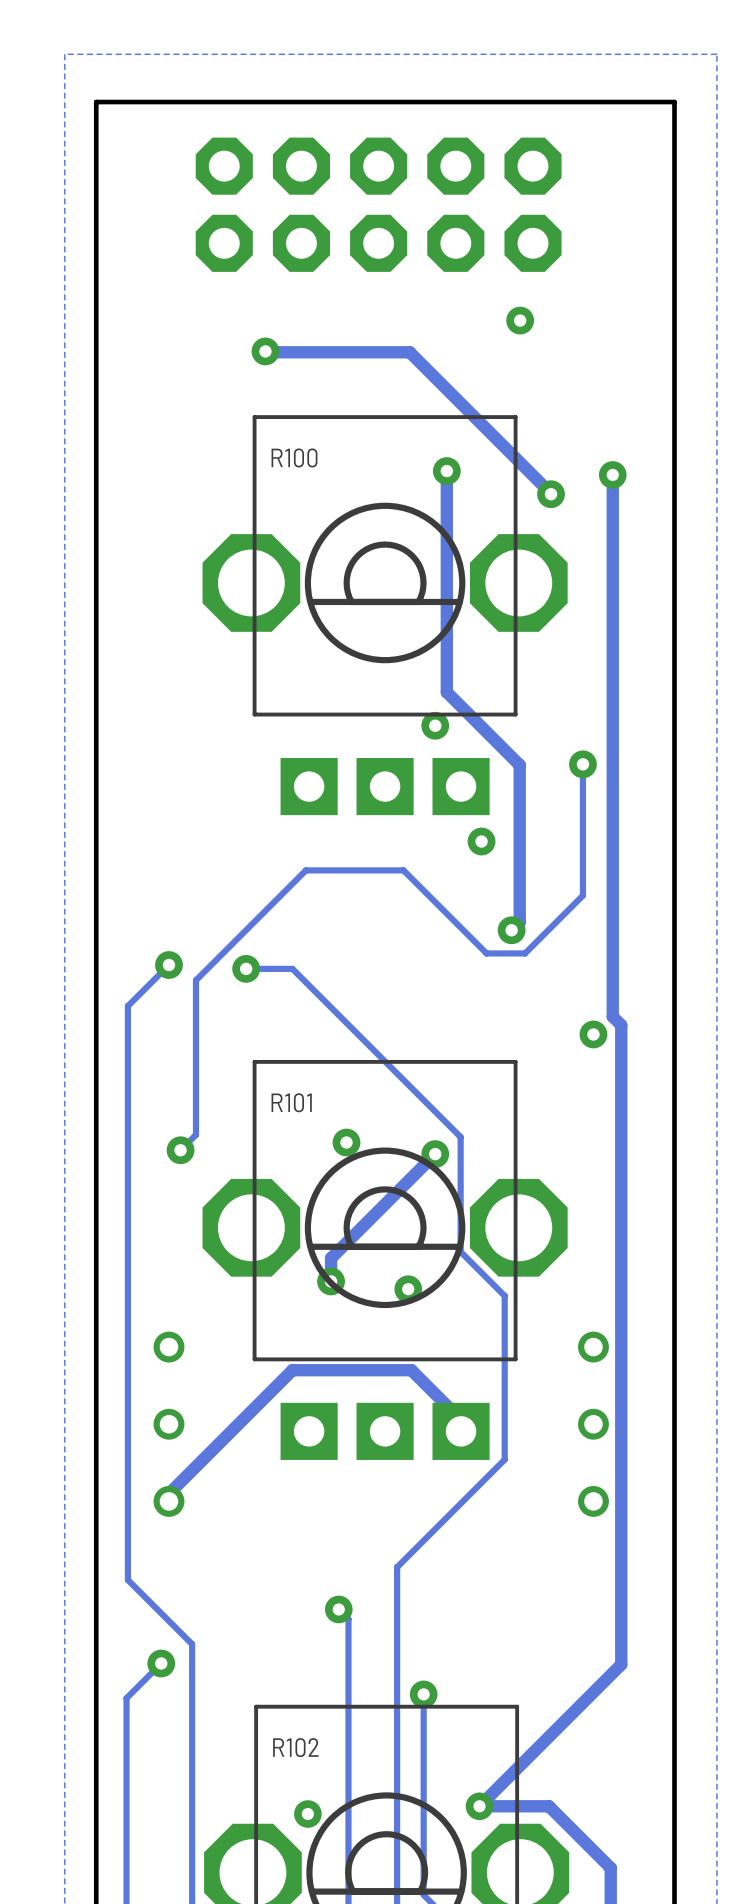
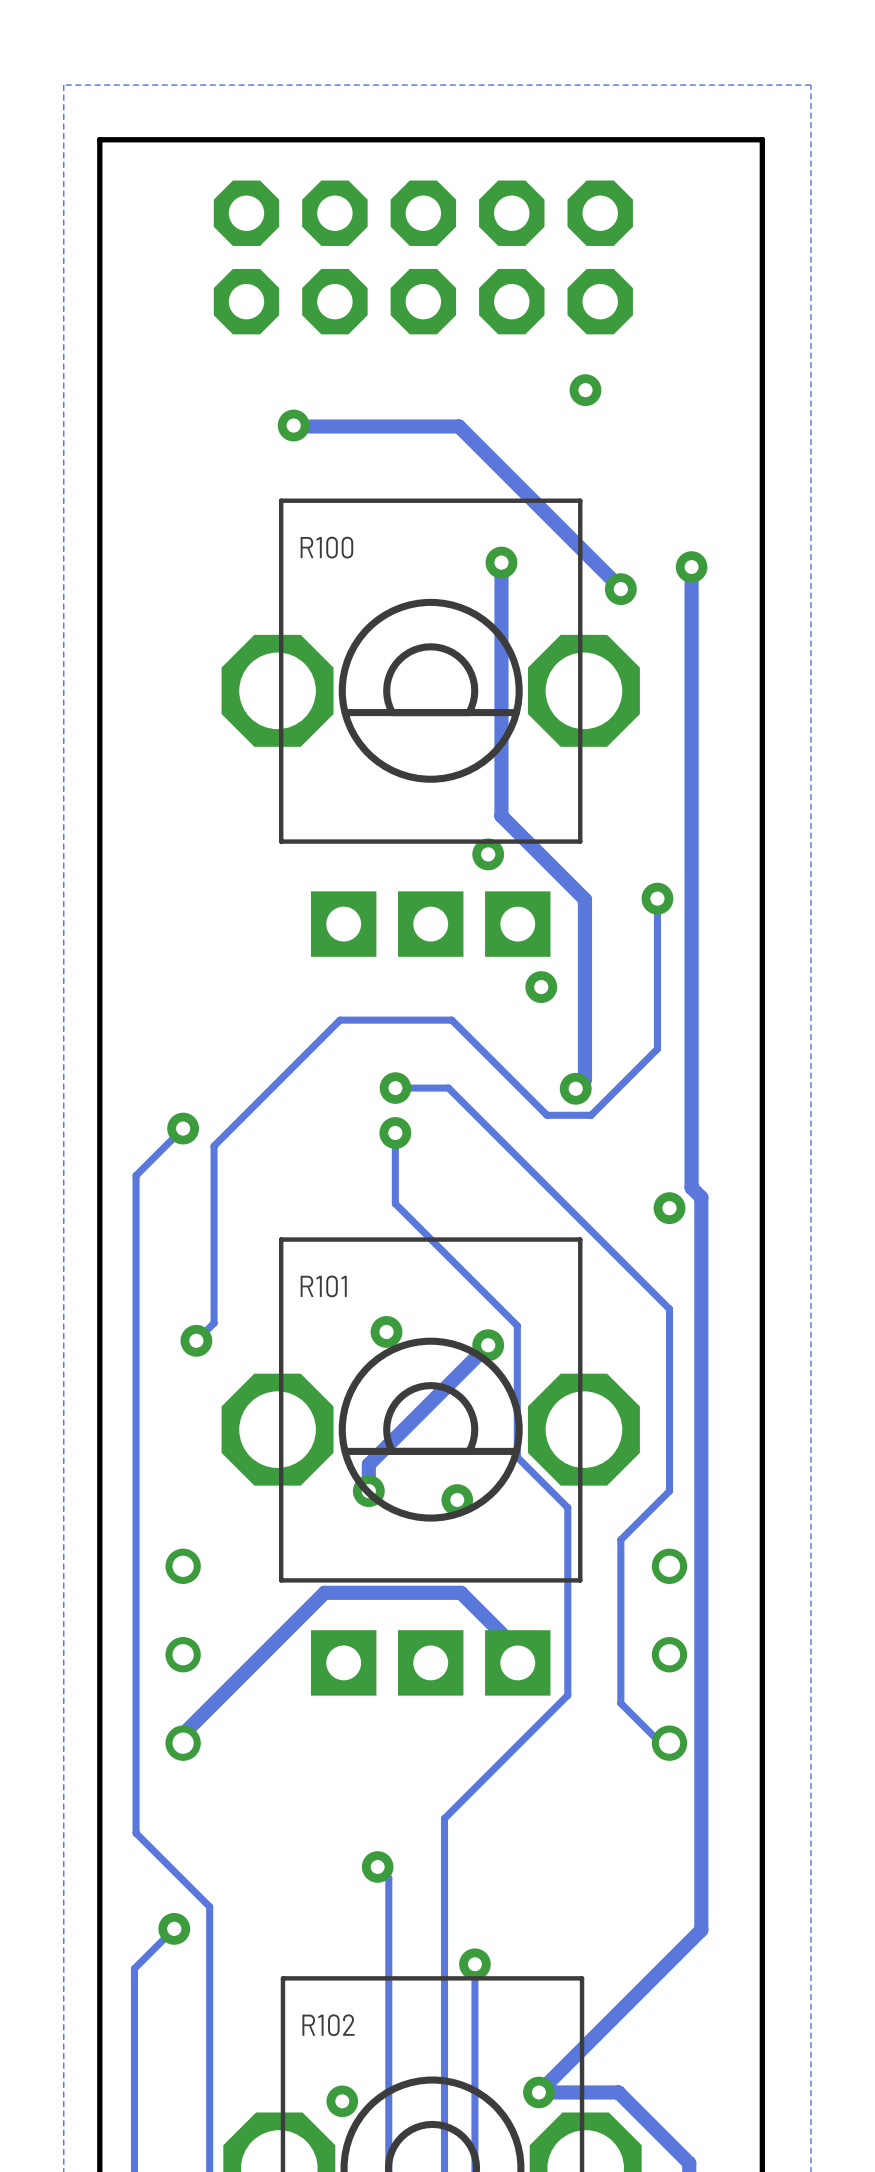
track: none -> (395, 1088) (448, 1088) (669, 1309) (669, 1491) (620, 1539) (620, 1703) (660, 1743) (669, 1743)
via: none -> (395, 1088)
track: (246, 968) (292, 968) (354, 1030) -> (395, 1132) (395, 1203)
via position: (246, 968) -> (395, 1132)

